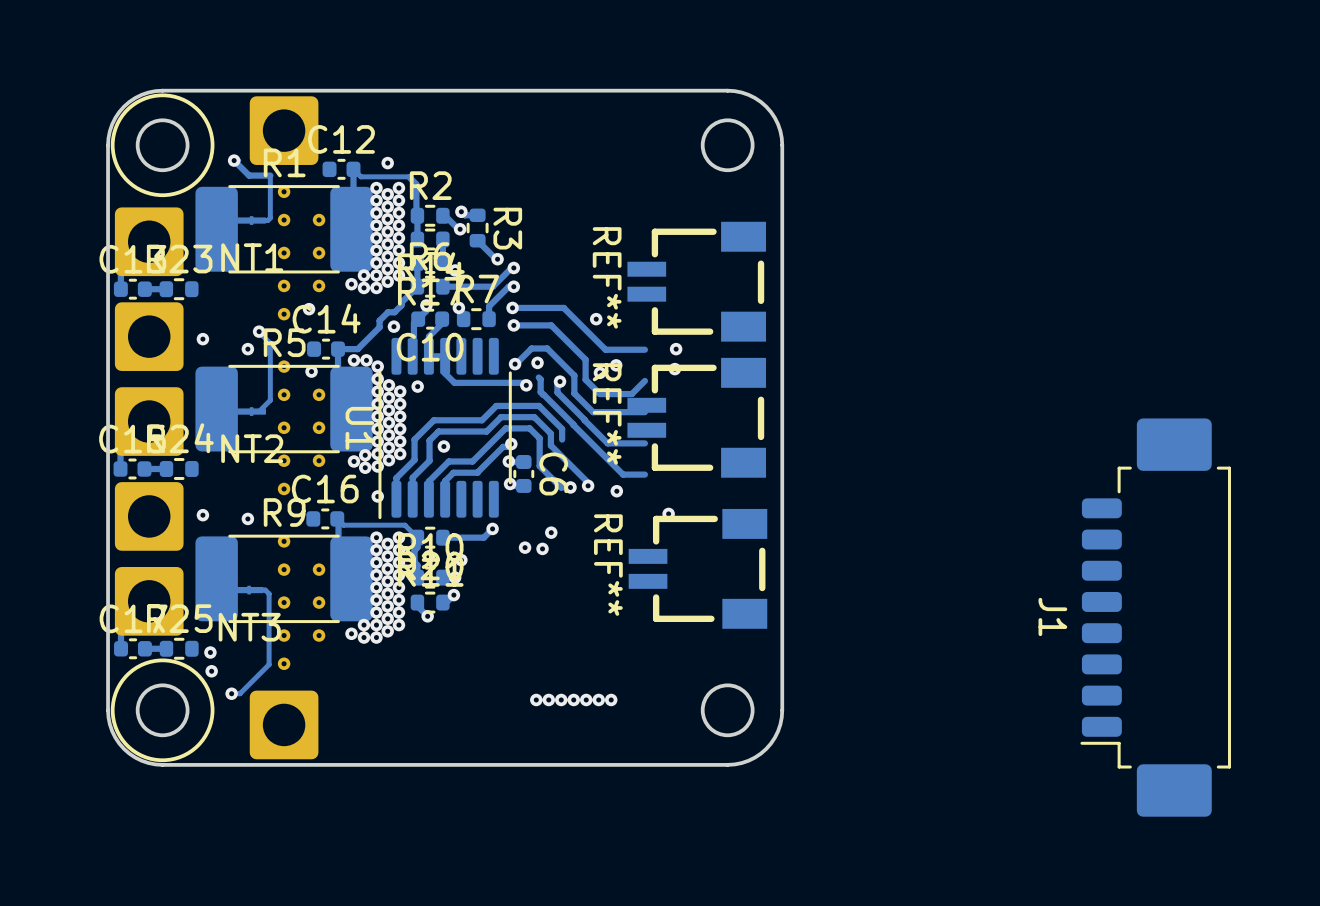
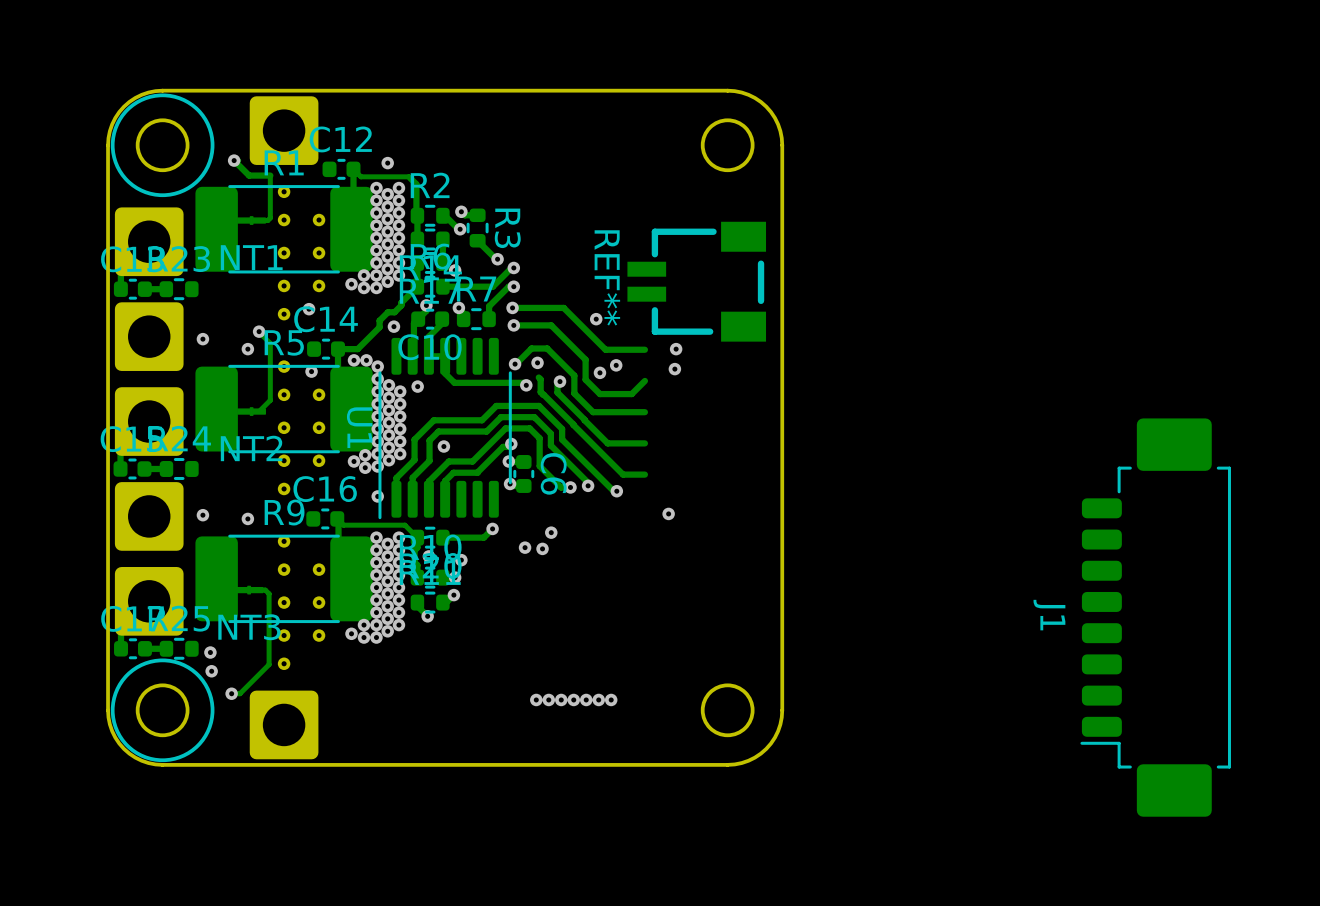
REF**: (696, 417) -> none
track: none -> (562, 439) (613, 491)
REF**: (697, 568) -> none

